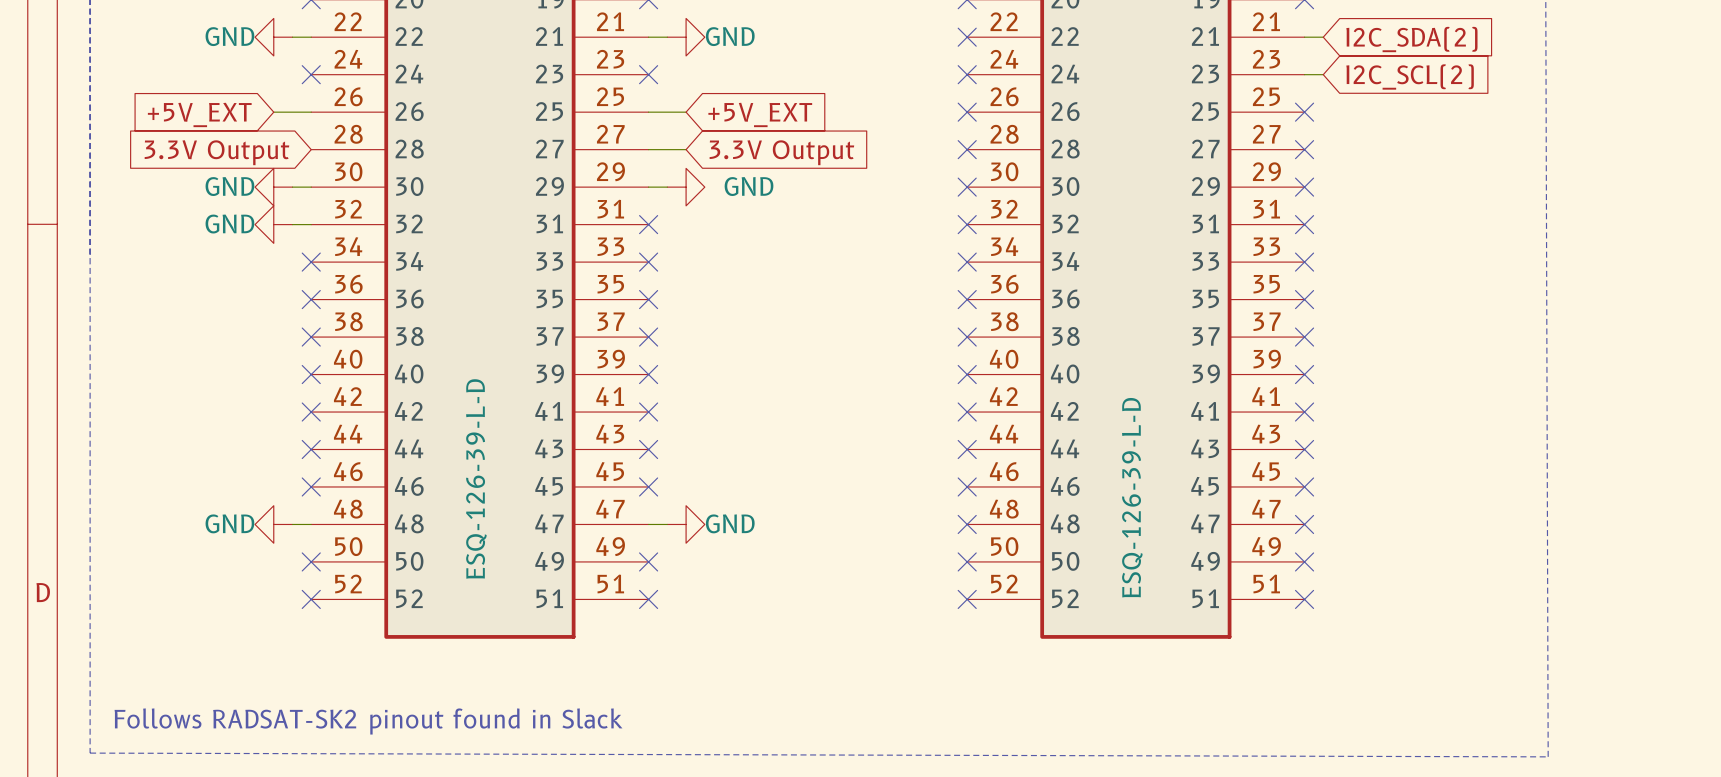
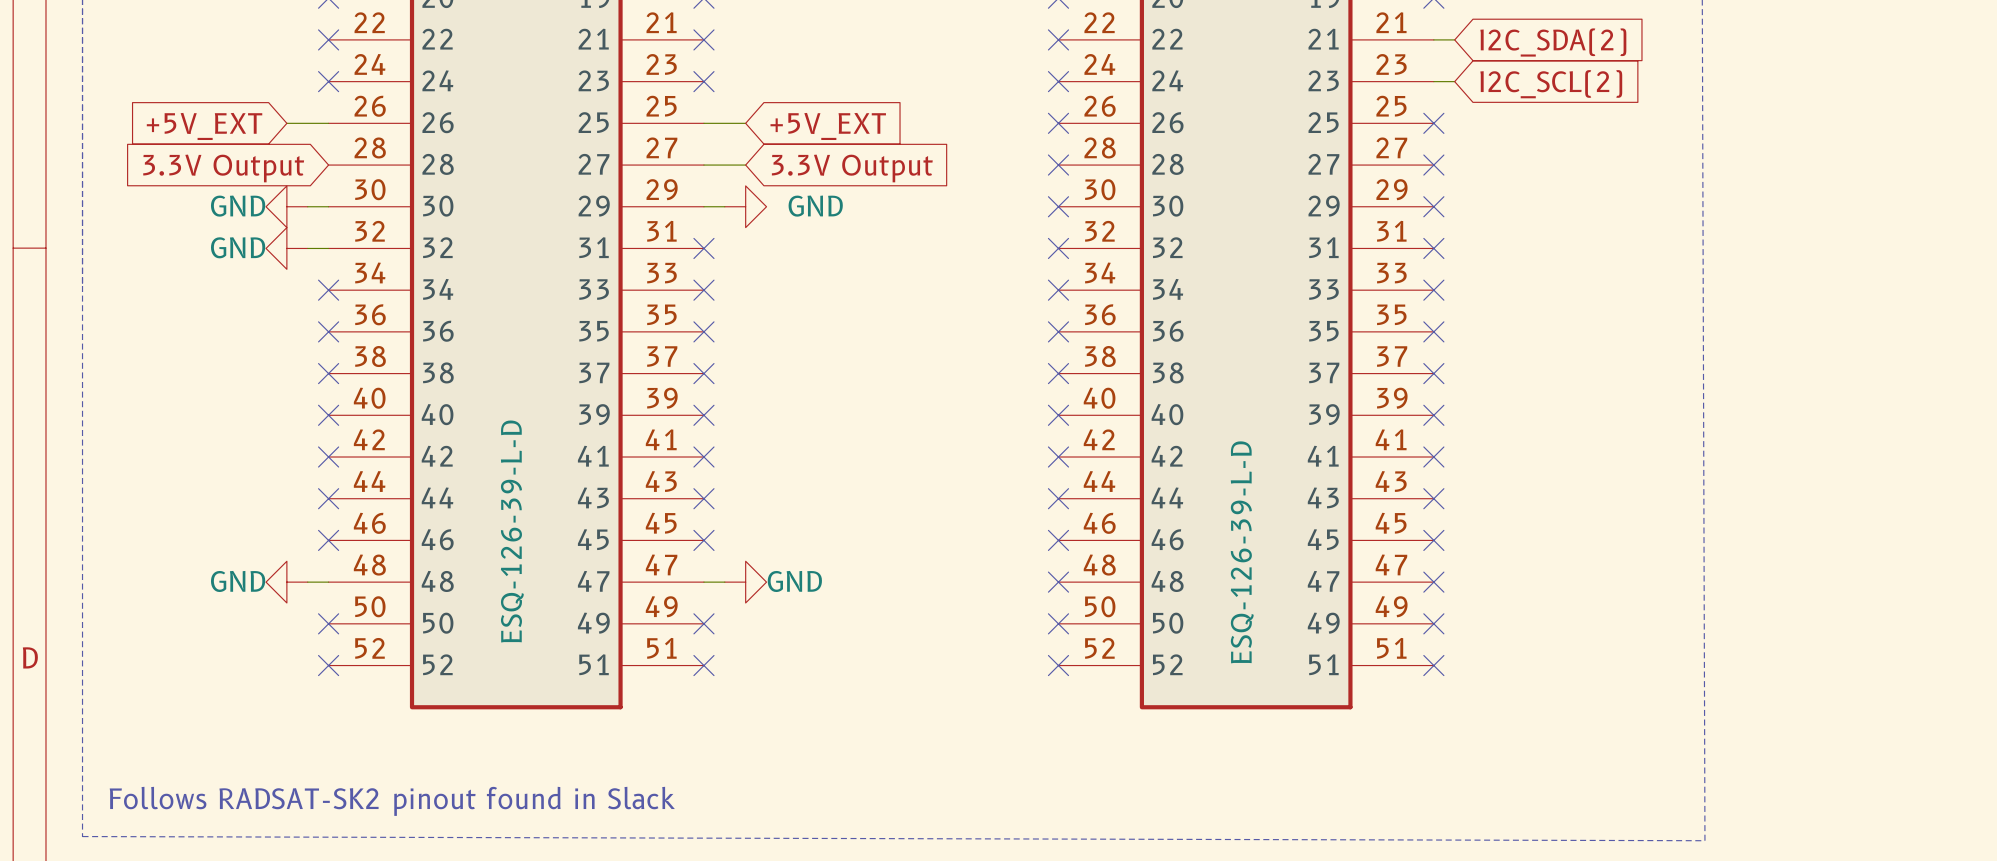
power symbol: GND (273, 37) -> none
wire: (292, 37) (311, 37) -> none
no-connect mark: none -> (328, 39)
wire: (648, 37) (667, 37) -> none
no-connect mark: none -> (703, 39)
power symbol: GND (686, 37) -> none

